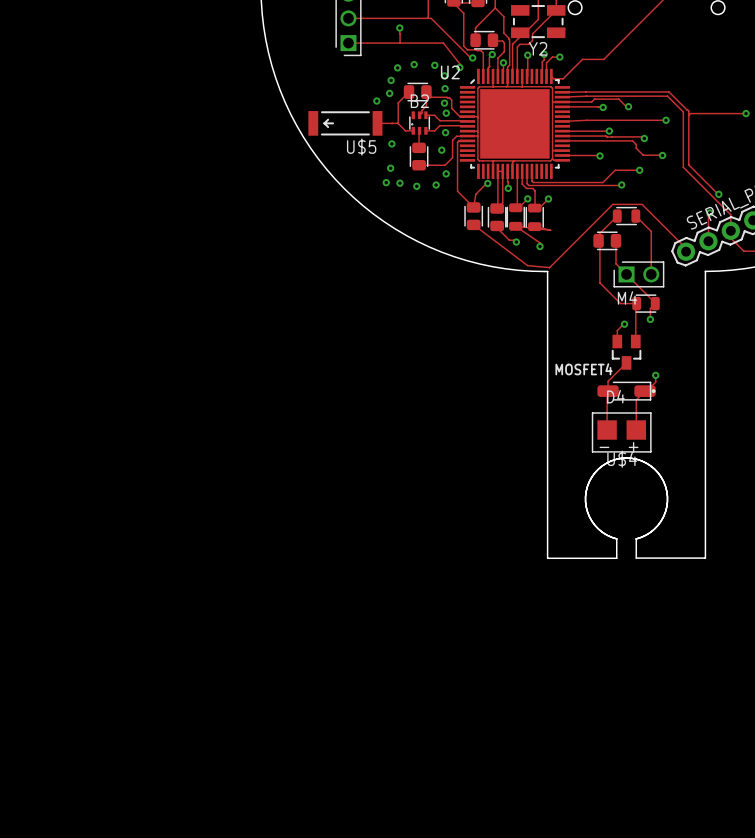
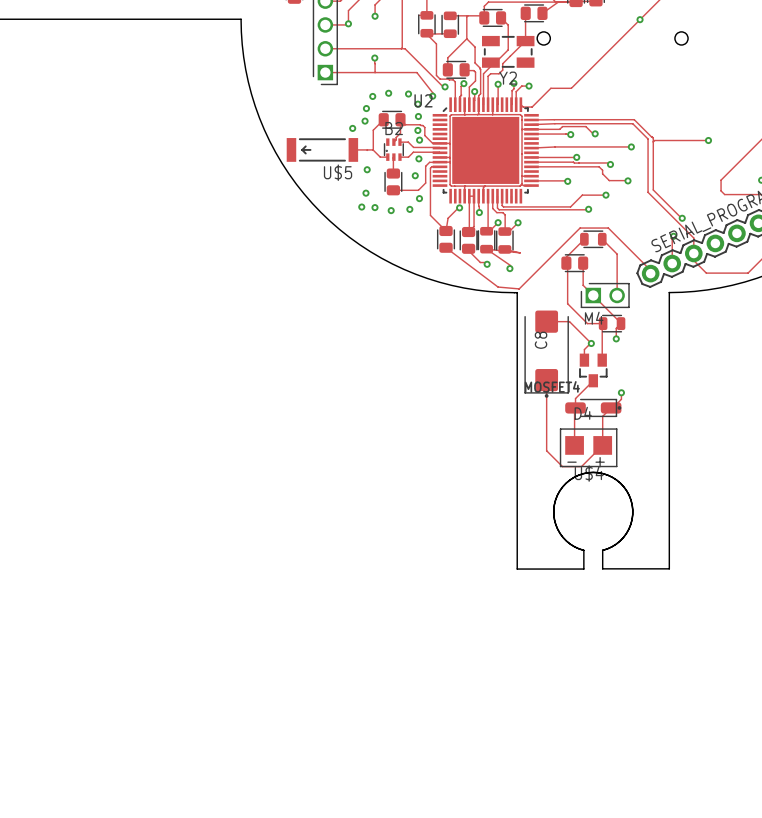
track: none -> (546, 321) (569, 321) (591, 343)
C8: none -> (546, 354)
track: none -> (546, 380) (546, 450) (562, 466) (581, 466) (602, 445)

